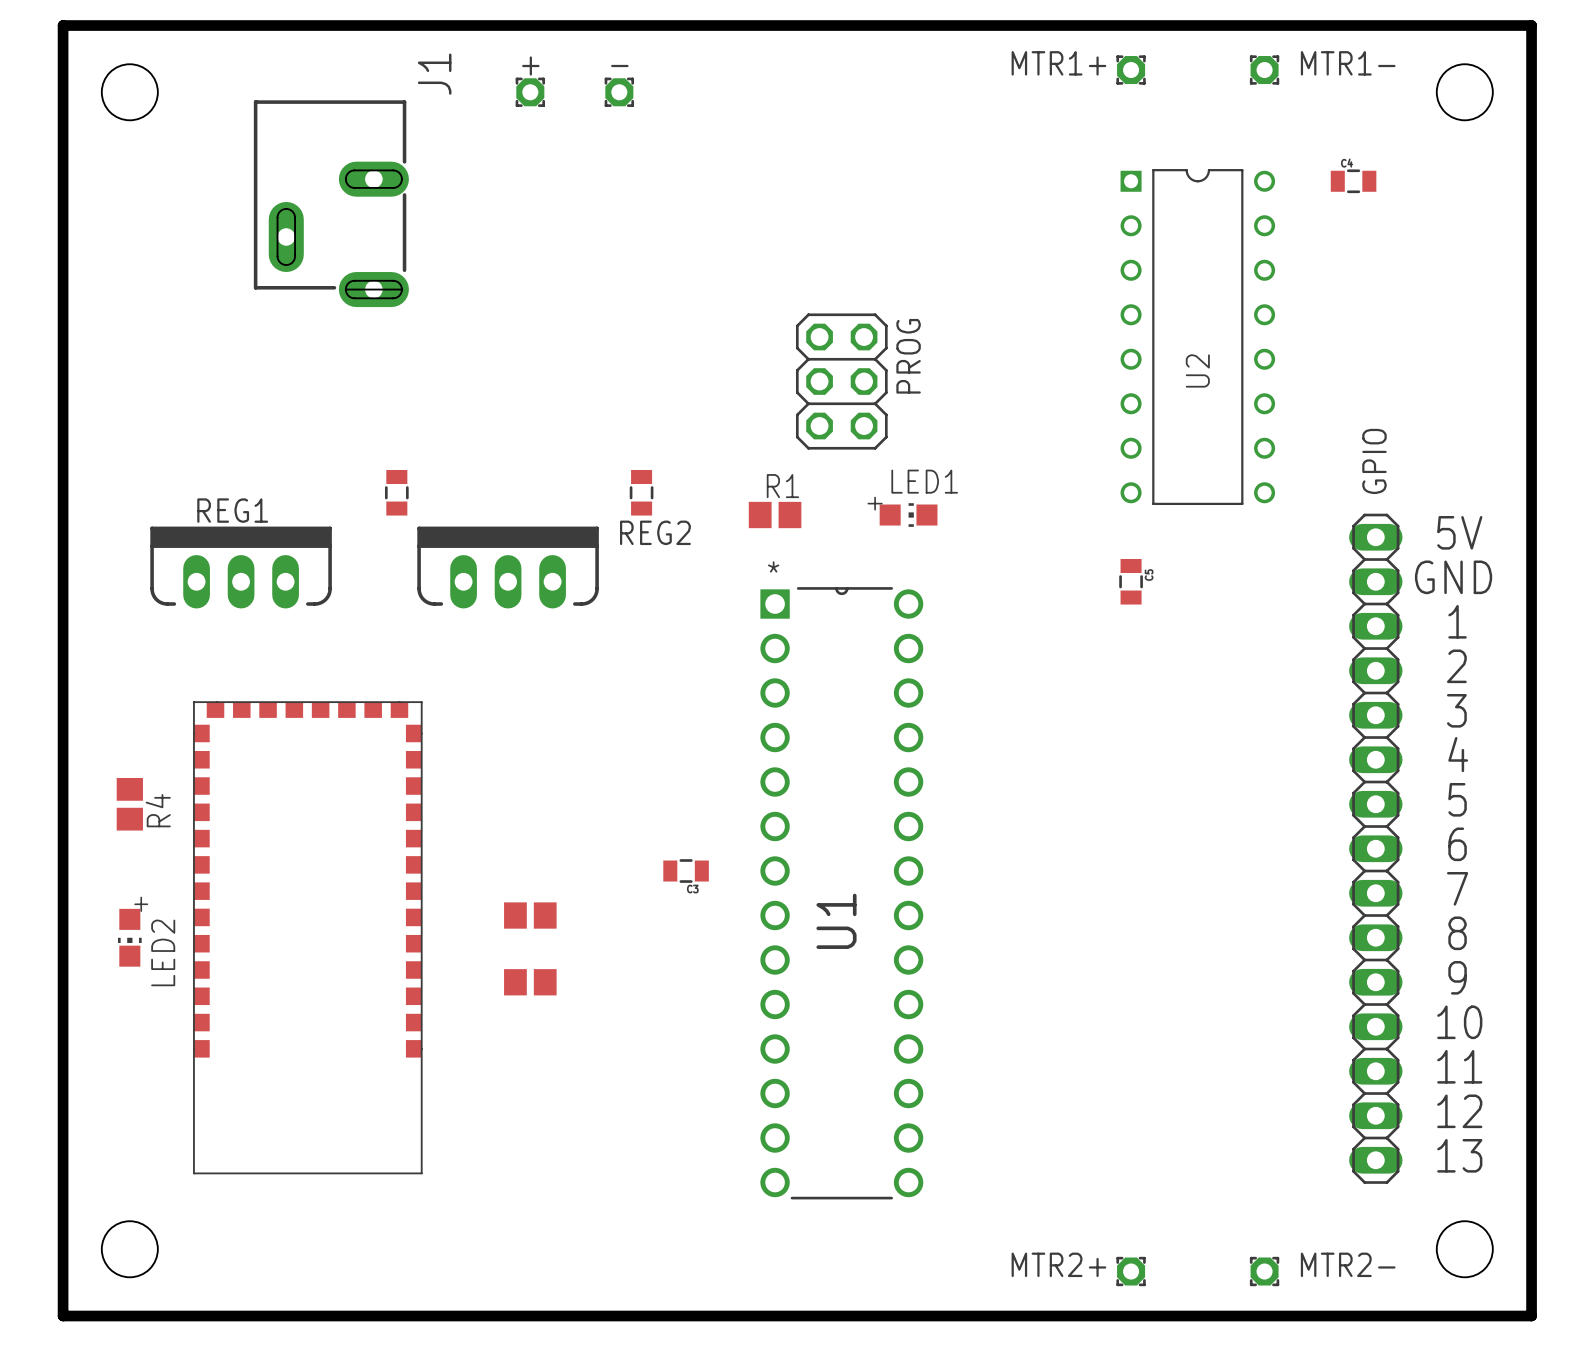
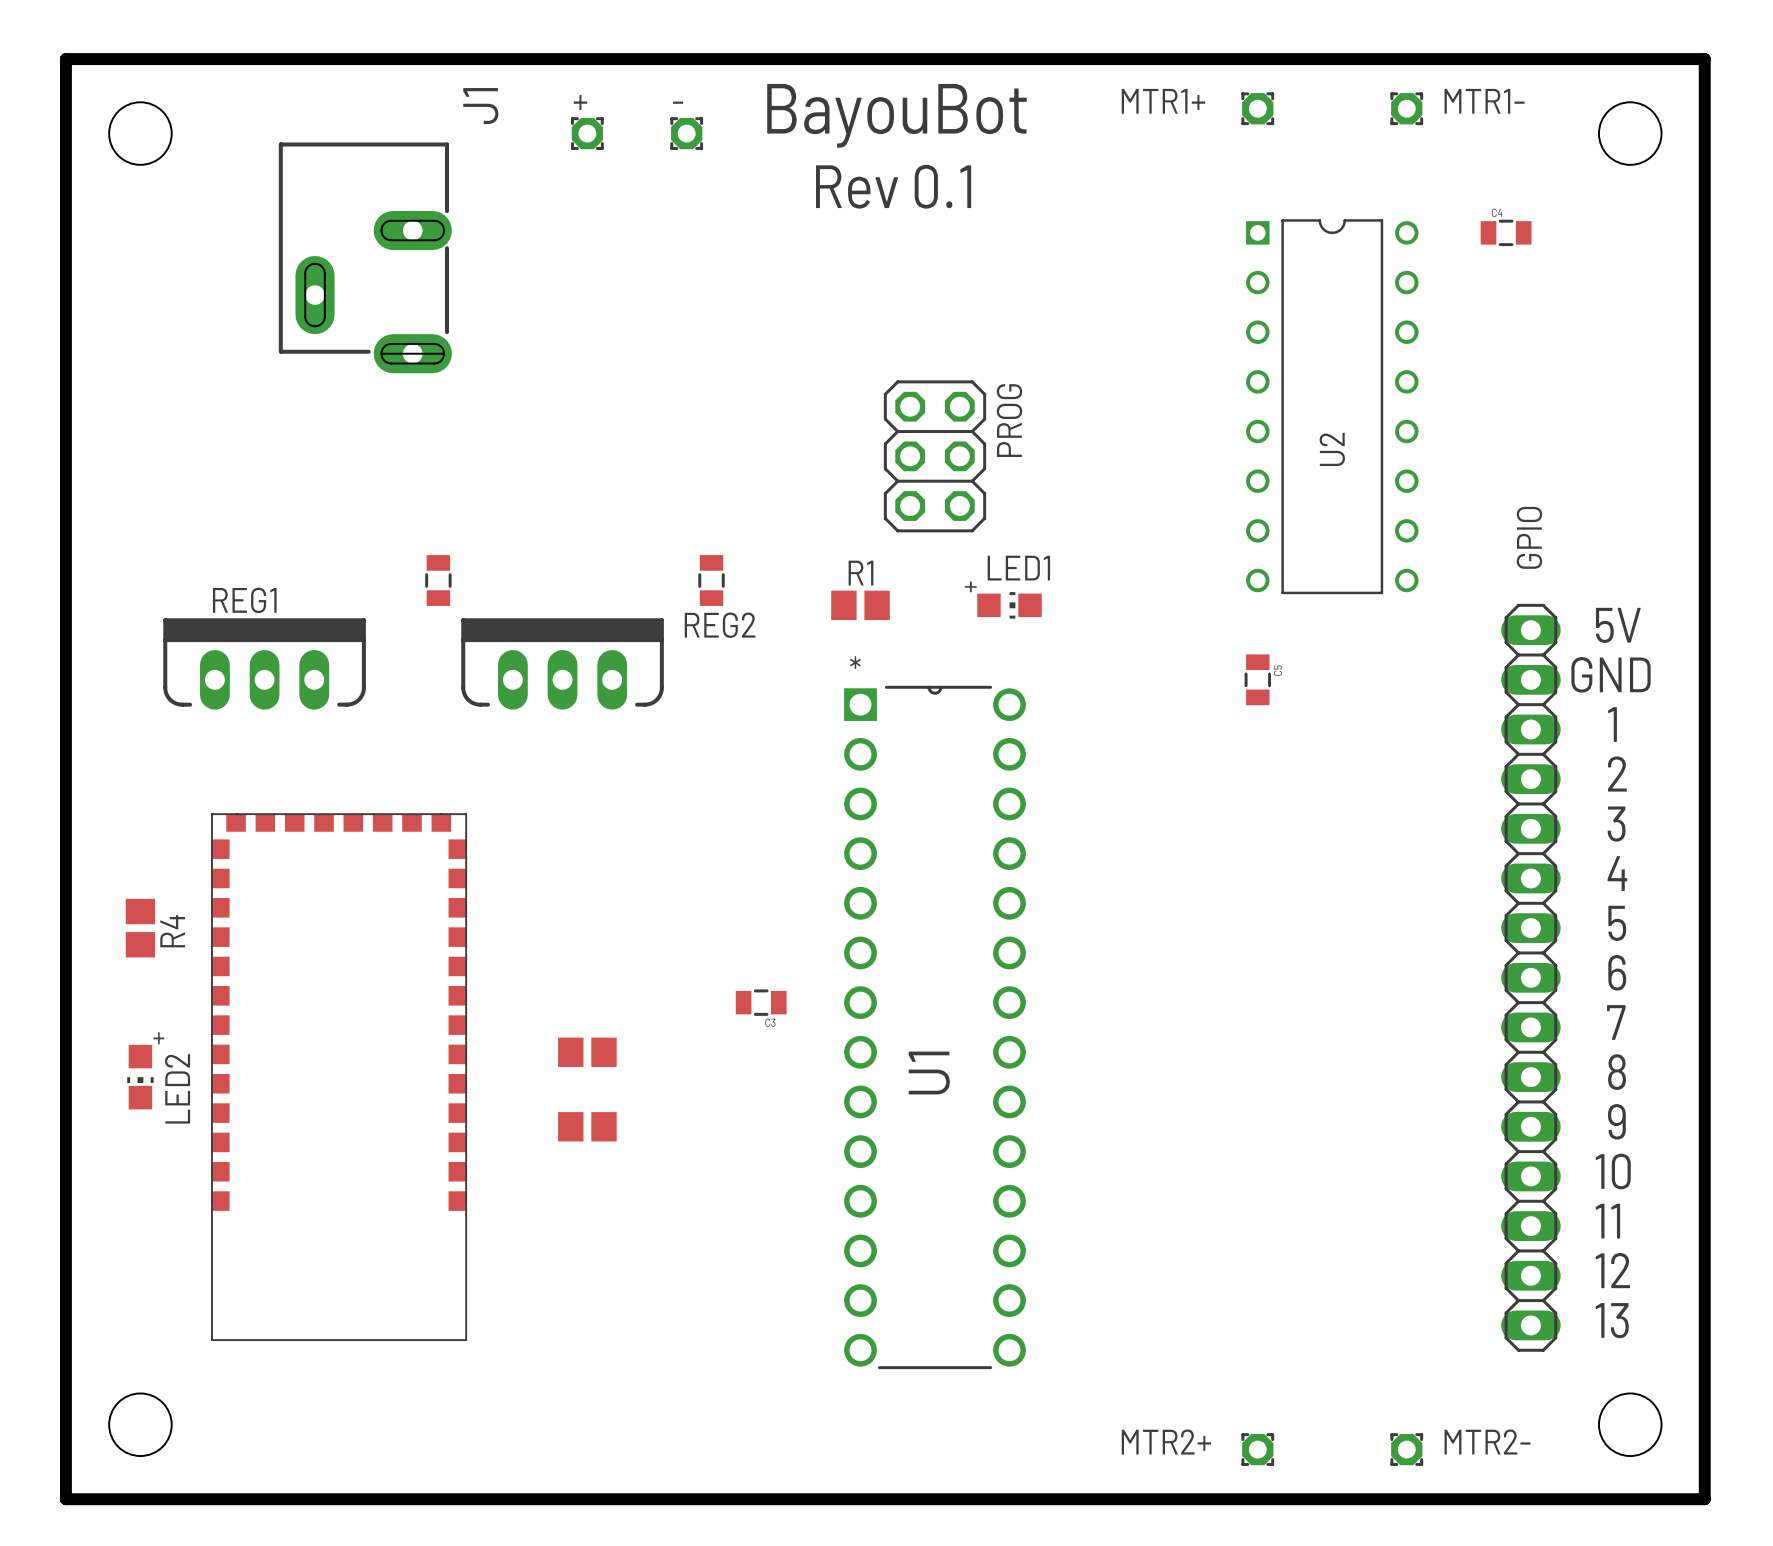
text: none -> BayouBot (896, 115)
text: none -> Rev 0.1 (893, 186)

